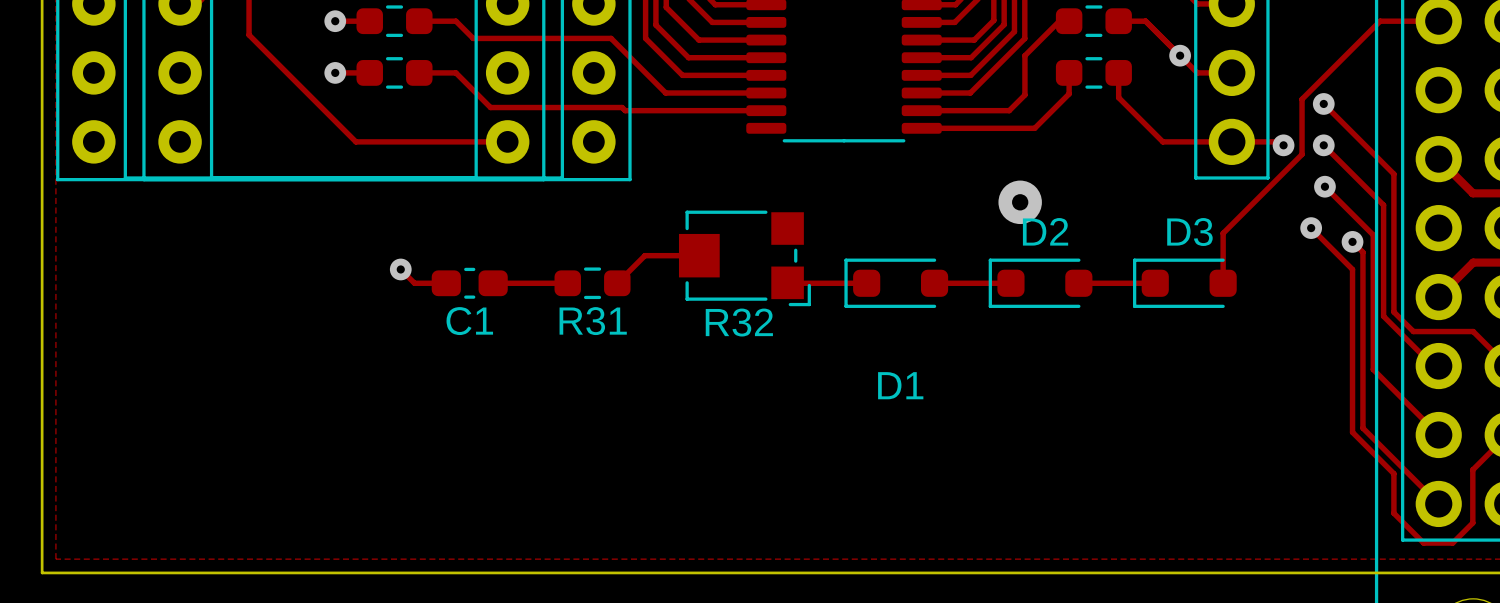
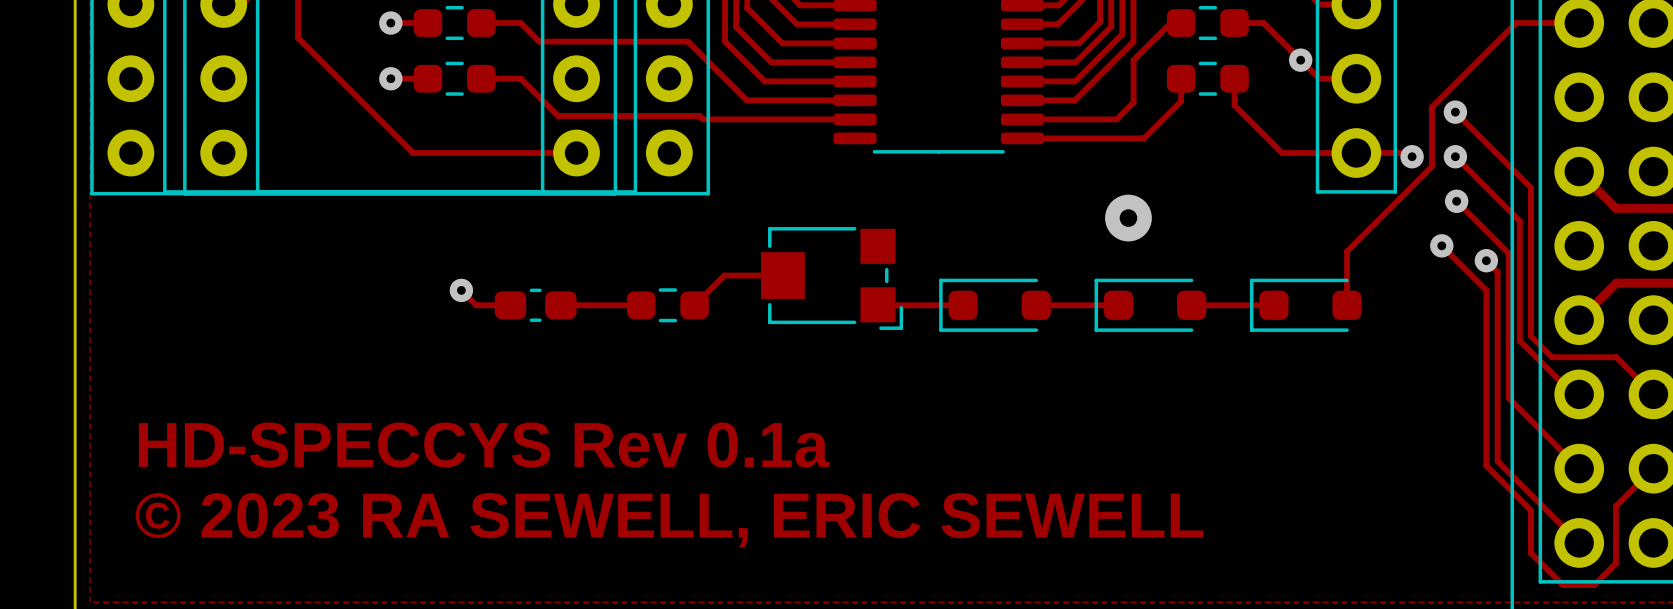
D2 name: D2 (1045, 231) -> none
D3 name: D3 (1189, 232) -> none
C1 name: C1 (469, 321) -> none
R31 name: R31 (593, 321) -> none
R32 name: R32 (739, 322) -> none
D1 name: D1 (900, 385) -> none
text: none -> HD-SPECCYS Rev 0.1a (484, 445)
text: none -> © 2023 RA SEWELL, ERIC SEWELL (669, 520)

